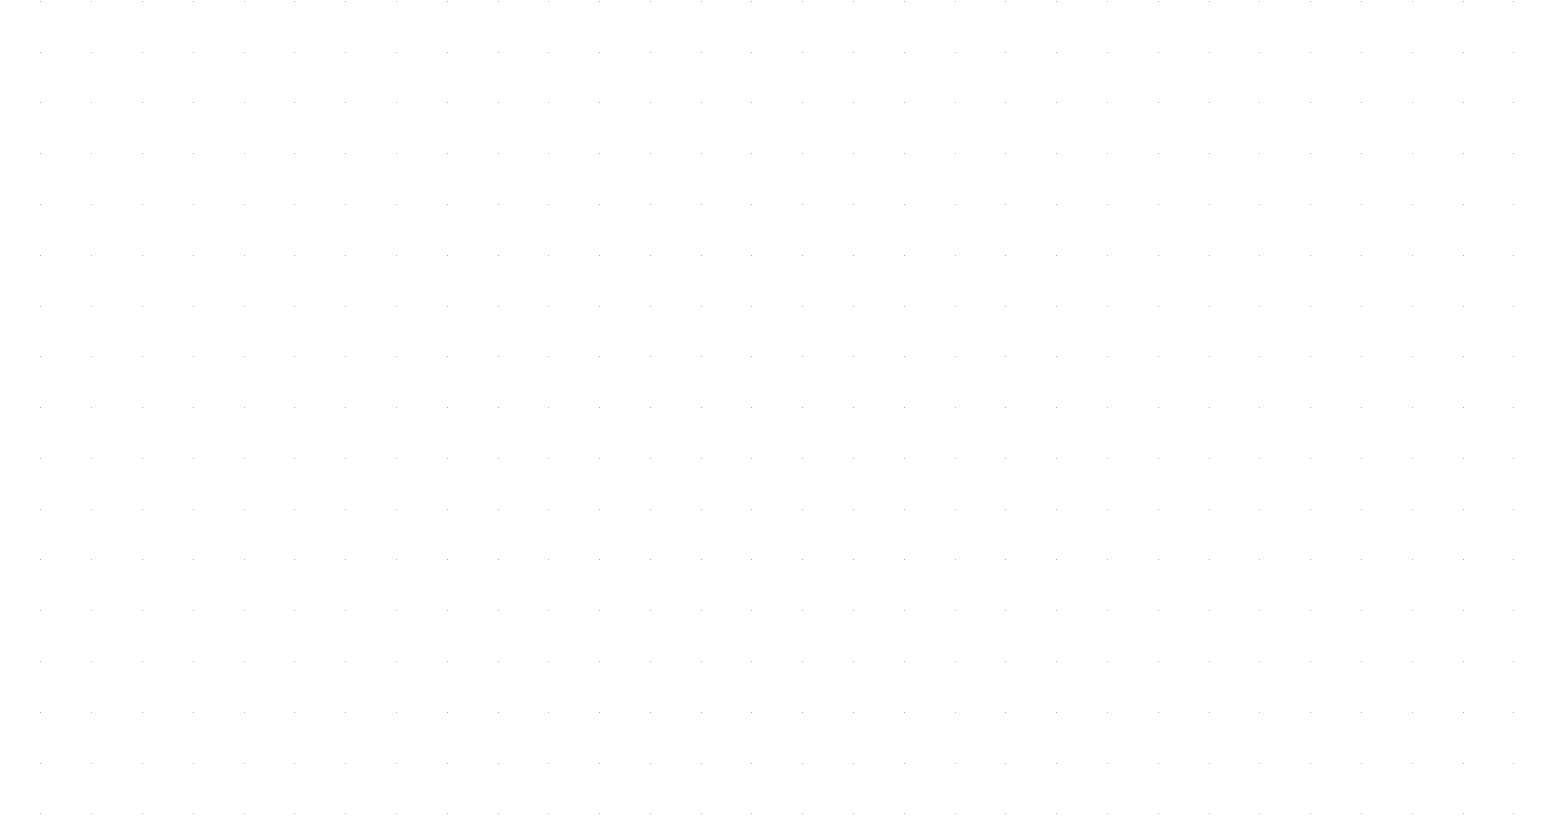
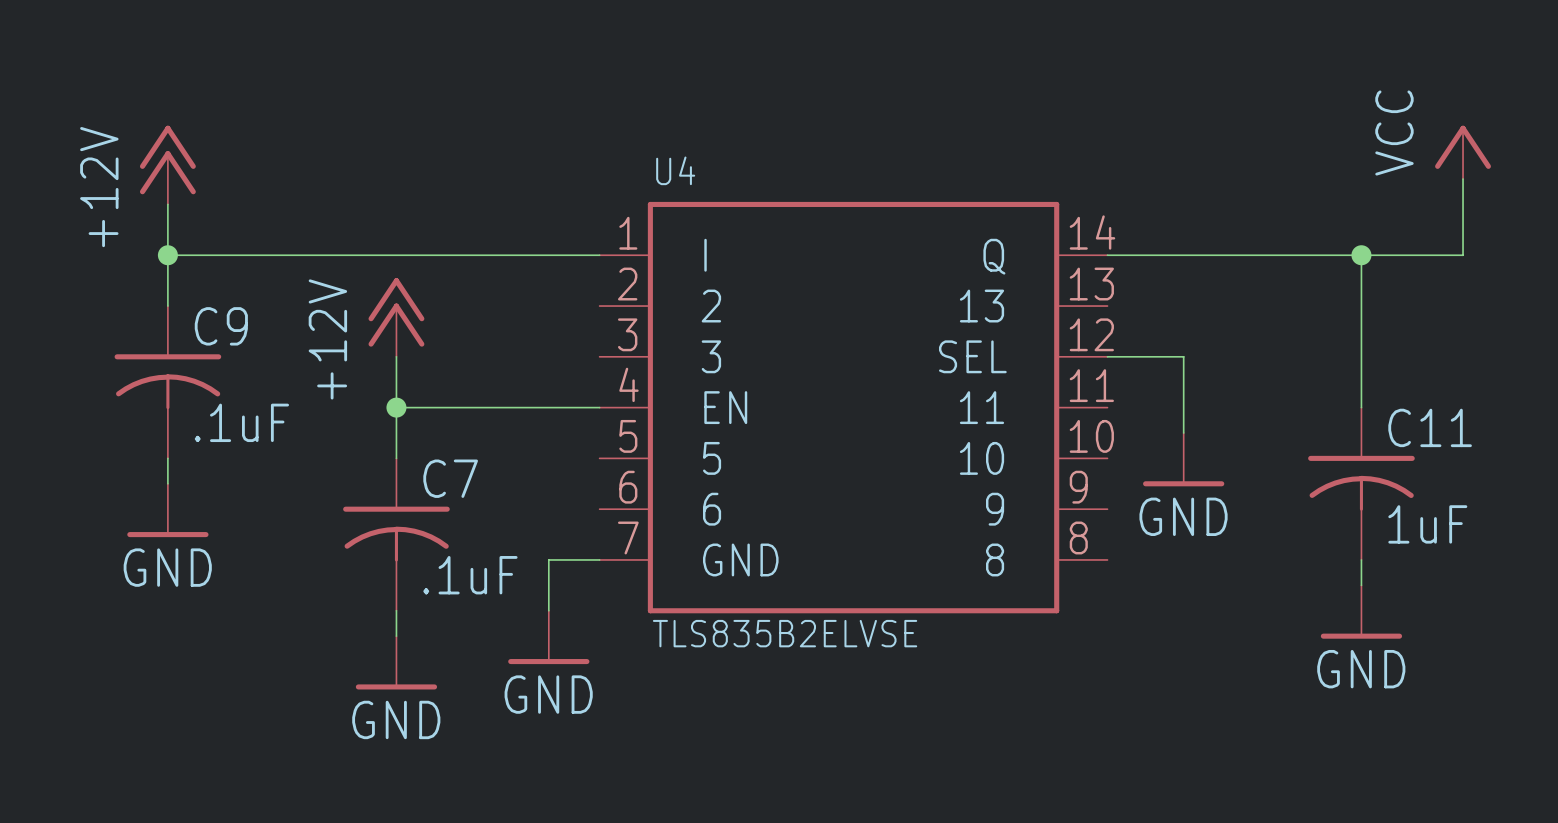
power symbol: none -> VCC (1463, 152)
power symbol: none -> +12V (167, 165)
wire: none -> (1463, 179) (1463, 255) (1107, 255)
wire: none -> (167, 204) (167, 306)
wire: none -> (167, 255) (599, 255)
junction: none -> (167, 255)
wire: none -> (1361, 255) (1361, 407)
junction: none -> (1361, 255)
power symbol: none -> +12V (396, 317)
wire: none -> (396, 356) (396, 458)
wire: none -> (1107, 356) (1183, 356) (1183, 433)
C9: none -> .1uF (167, 382)
wire: none -> (396, 407) (599, 407)
junction: none -> (396, 407)
U4: none -> TLS835B2ELVSE (853, 407)
wire: none -> (167, 458) (167, 483)
power symbol: none -> GND (1183, 459)
C11: none -> 1uF (1361, 483)
power symbol: none -> GND (167, 510)
C7: none -> .1uF (396, 534)
wire: none -> (599, 559) (548, 559) (548, 610)
wire: none -> (1361, 559) (1361, 585)
wire: none -> (396, 610) (396, 636)
power symbol: none -> GND (1361, 612)
power symbol: none -> GND (548, 637)
power symbol: none -> GND (396, 662)

